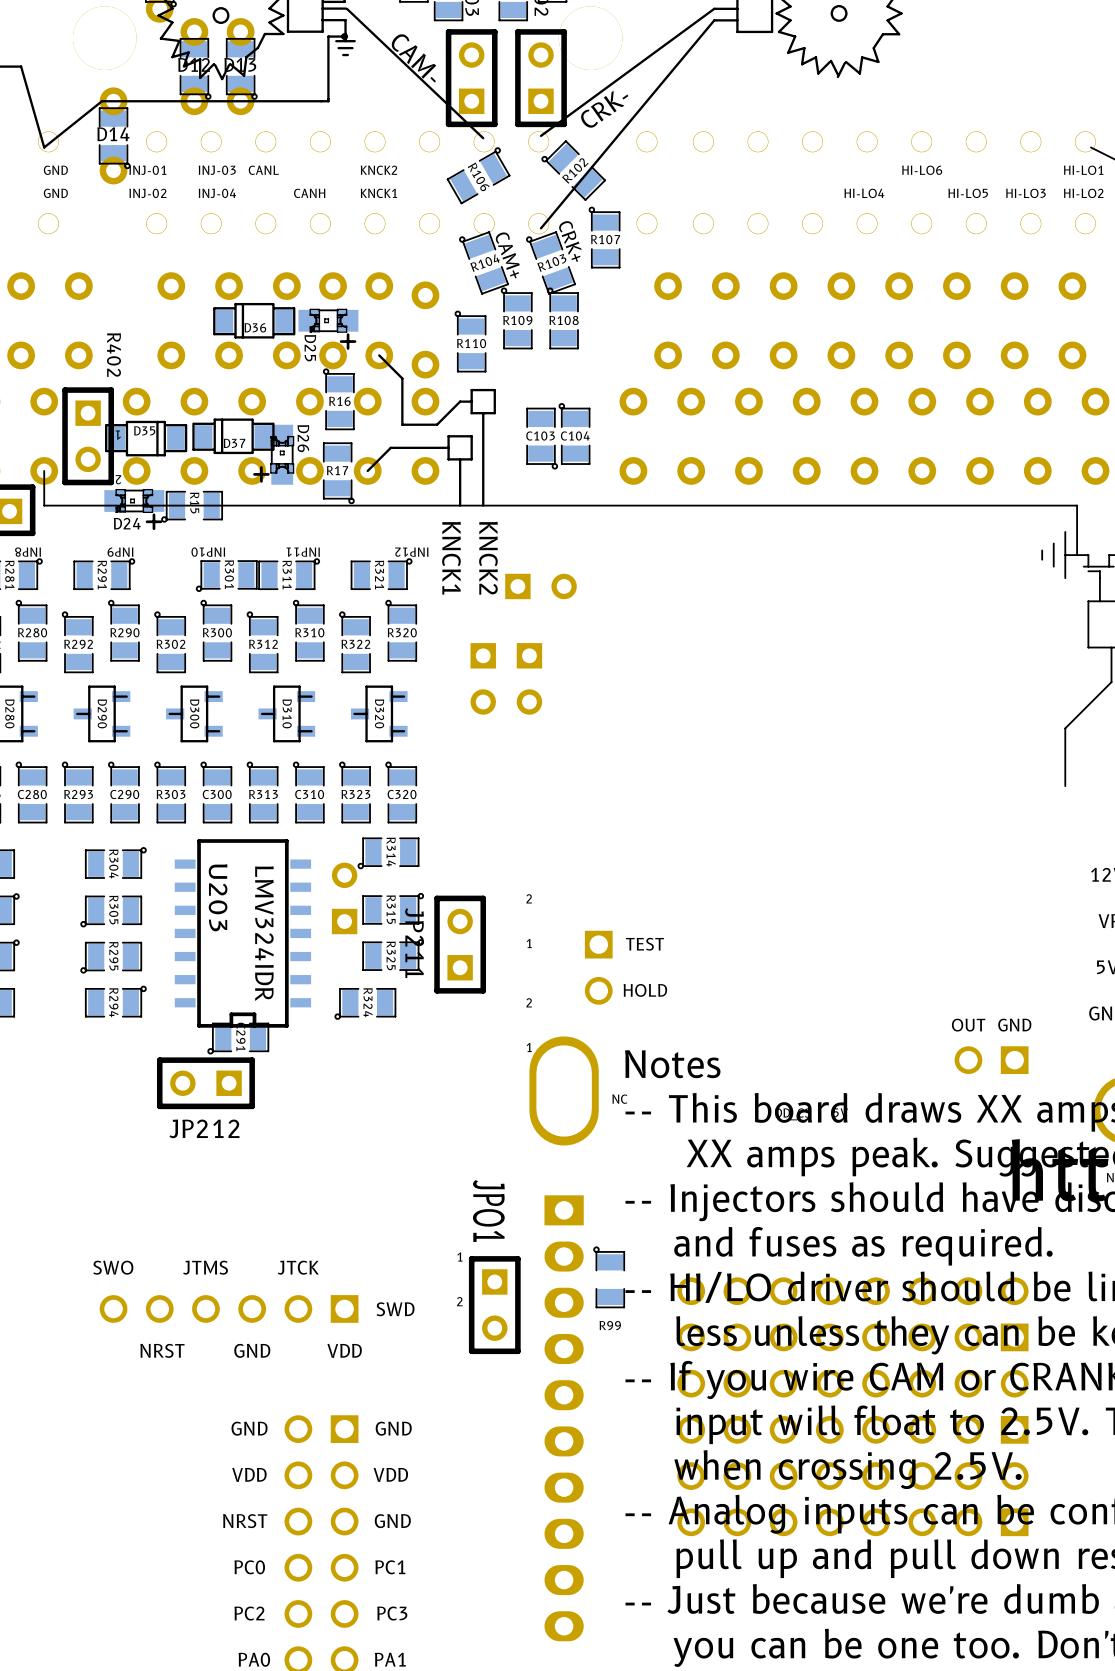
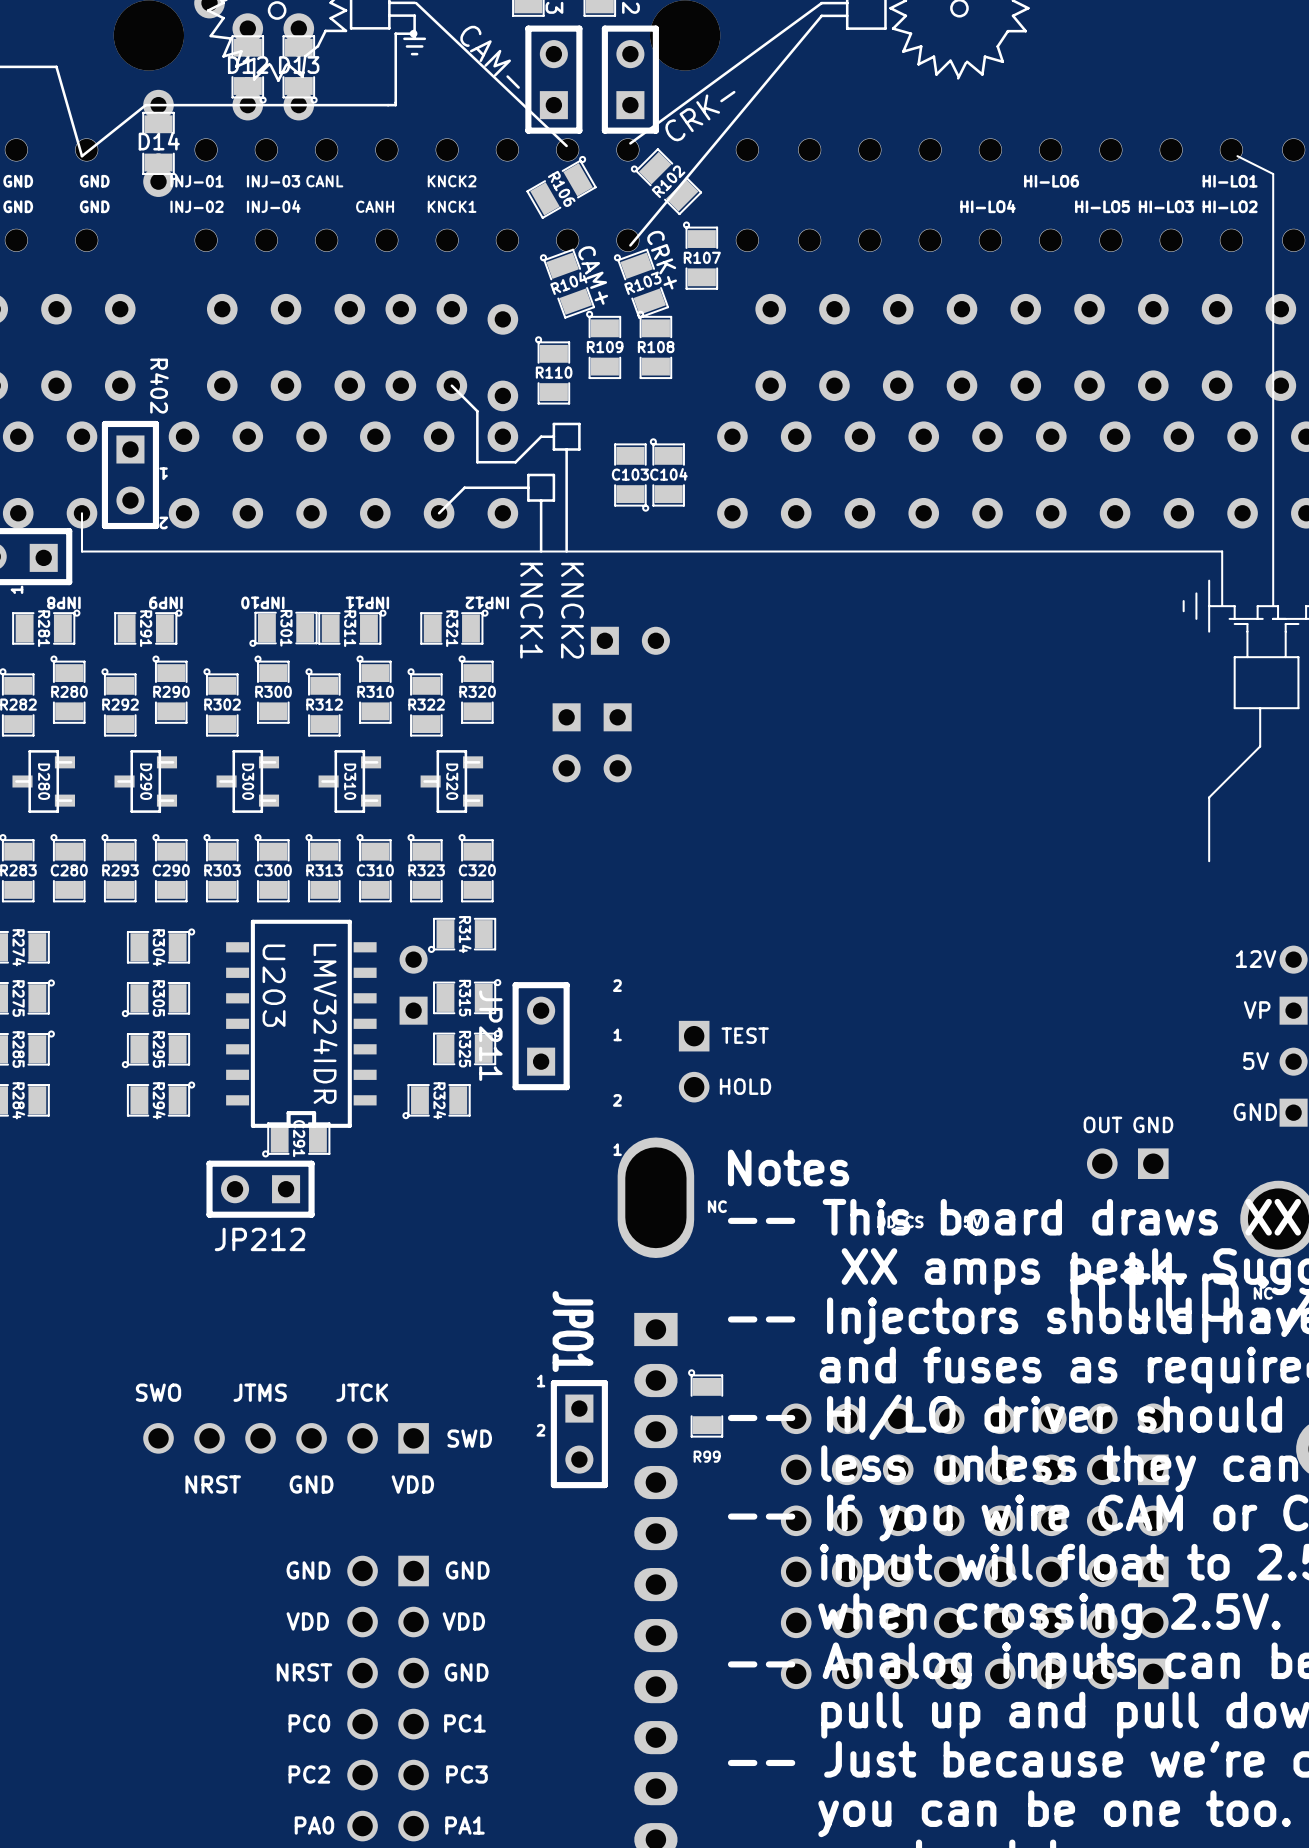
D36: (254, 320) -> none
D25: (328, 329) -> none
R16: (338, 399) -> none
D37: (233, 436) -> none
D35: (146, 438) -> none
D26: (273, 454) -> none
R17: (338, 473) -> none
R15: (192, 506) -> none
D24: (134, 509) -> none

